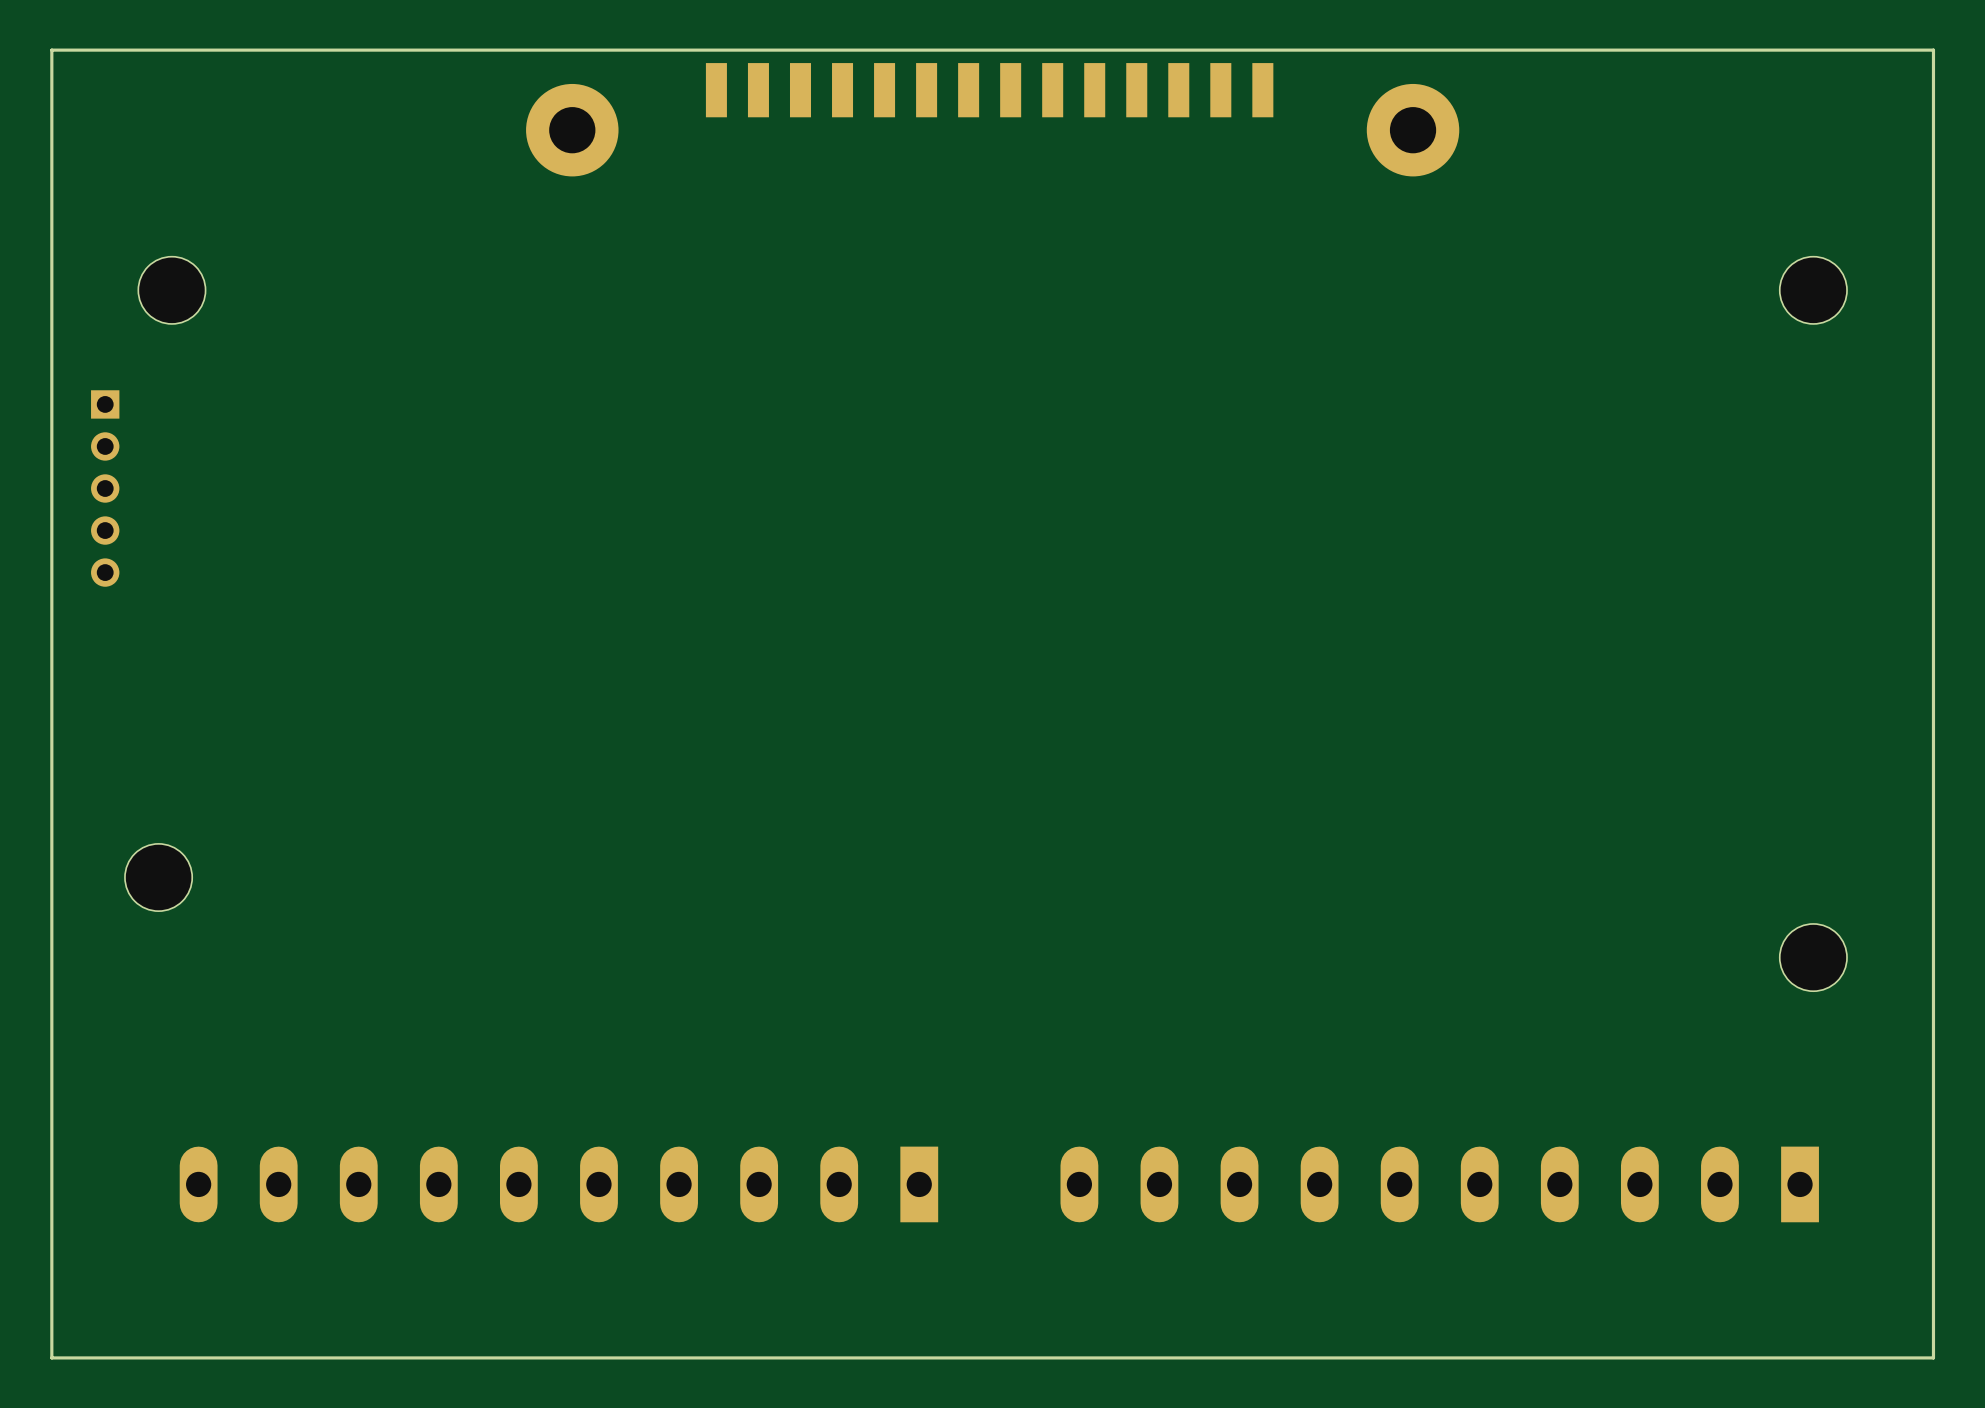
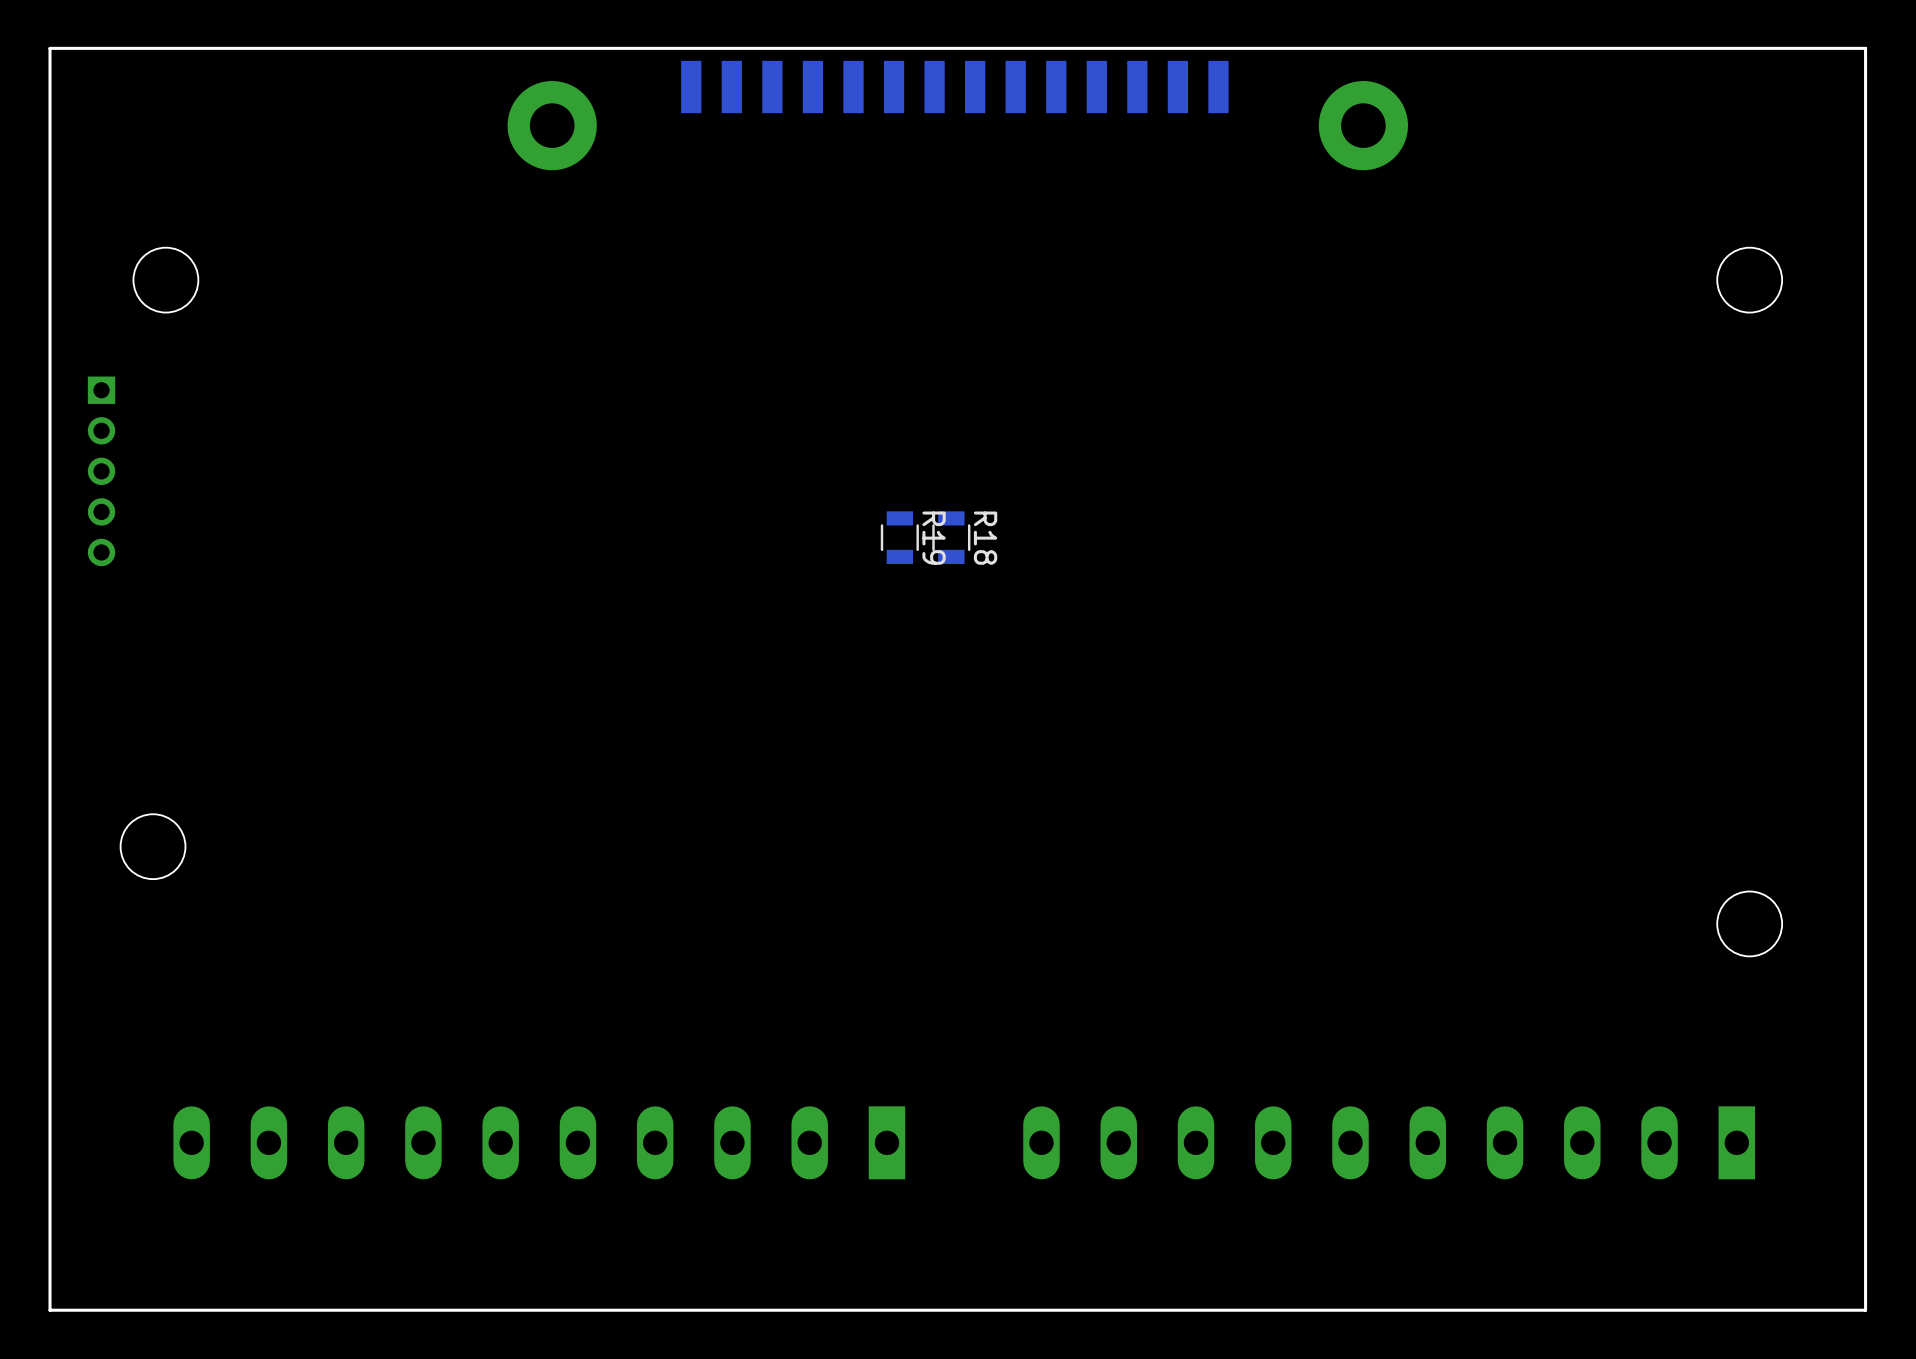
R19: none -> (899, 537)
R18: none -> (951, 537)

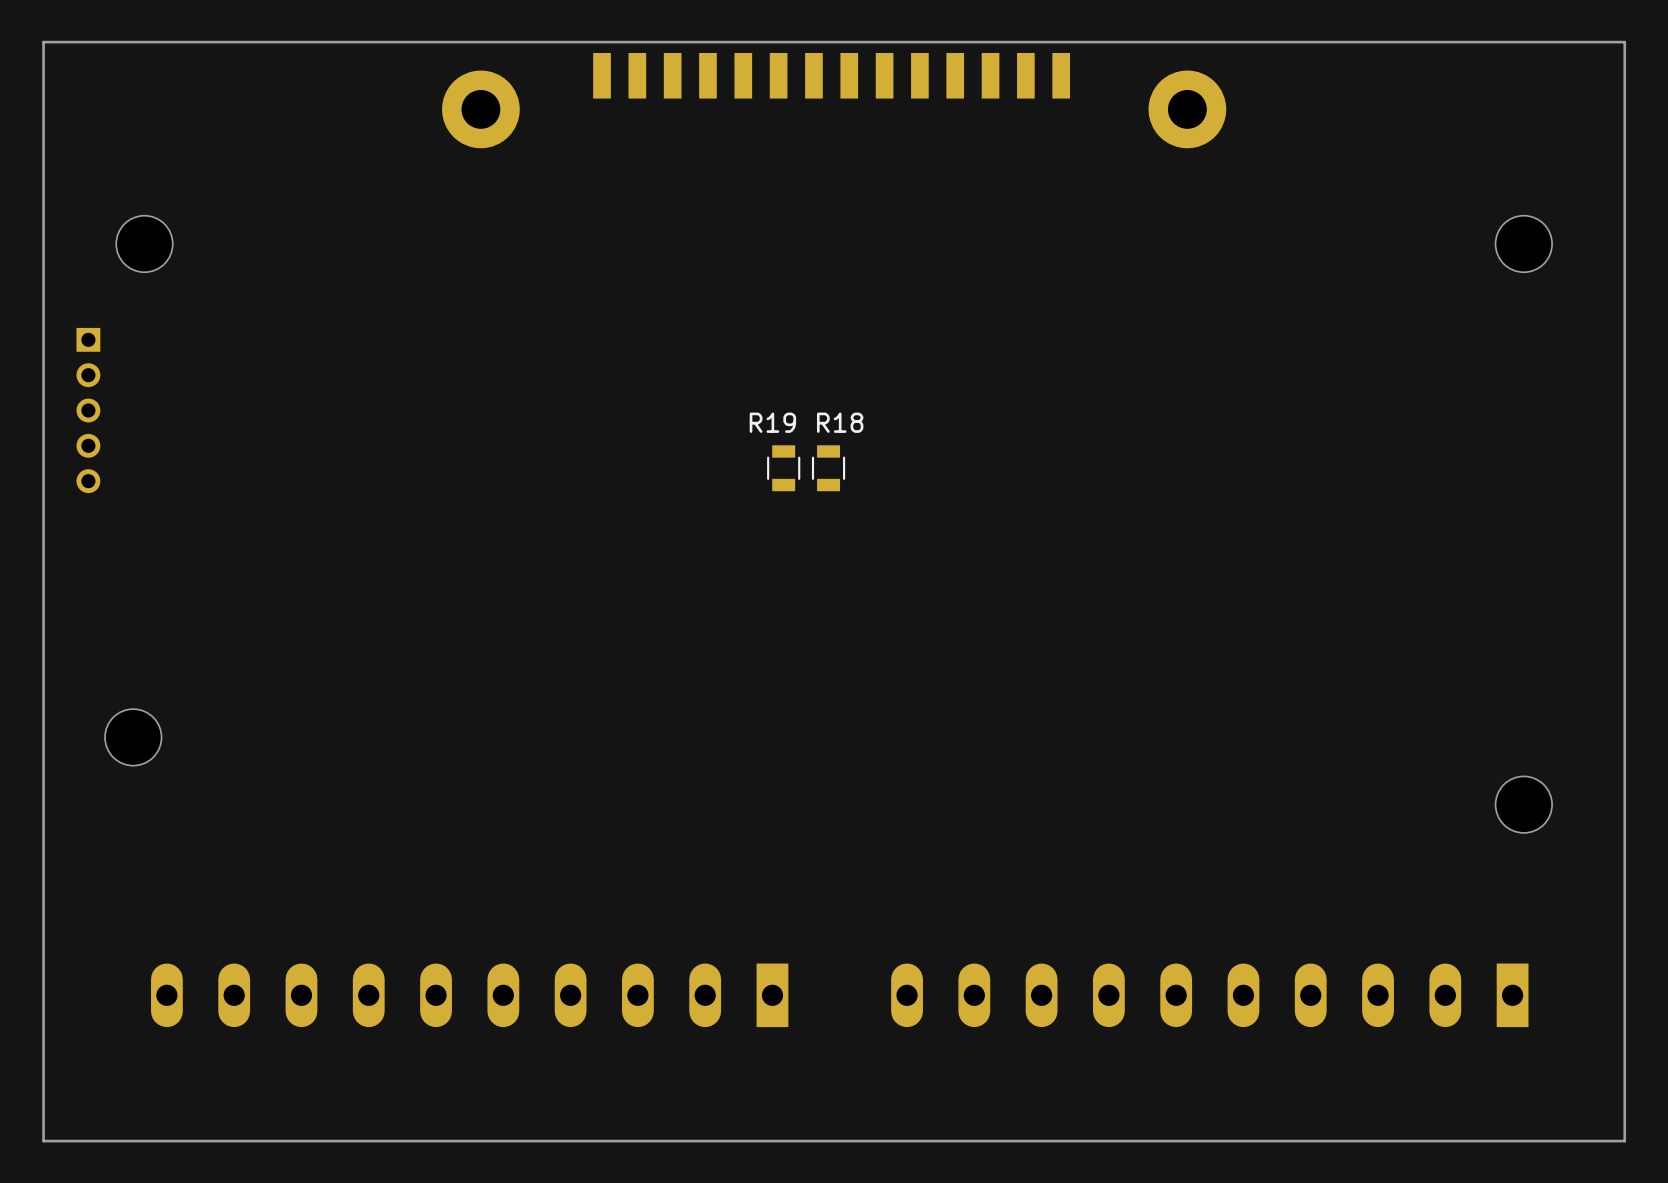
R19 name rotation: 0° (934, 538) -> 90° counterclockwise (772, 422)
R18 name rotation: 0° (985, 538) -> 90° counterclockwise (840, 422)

